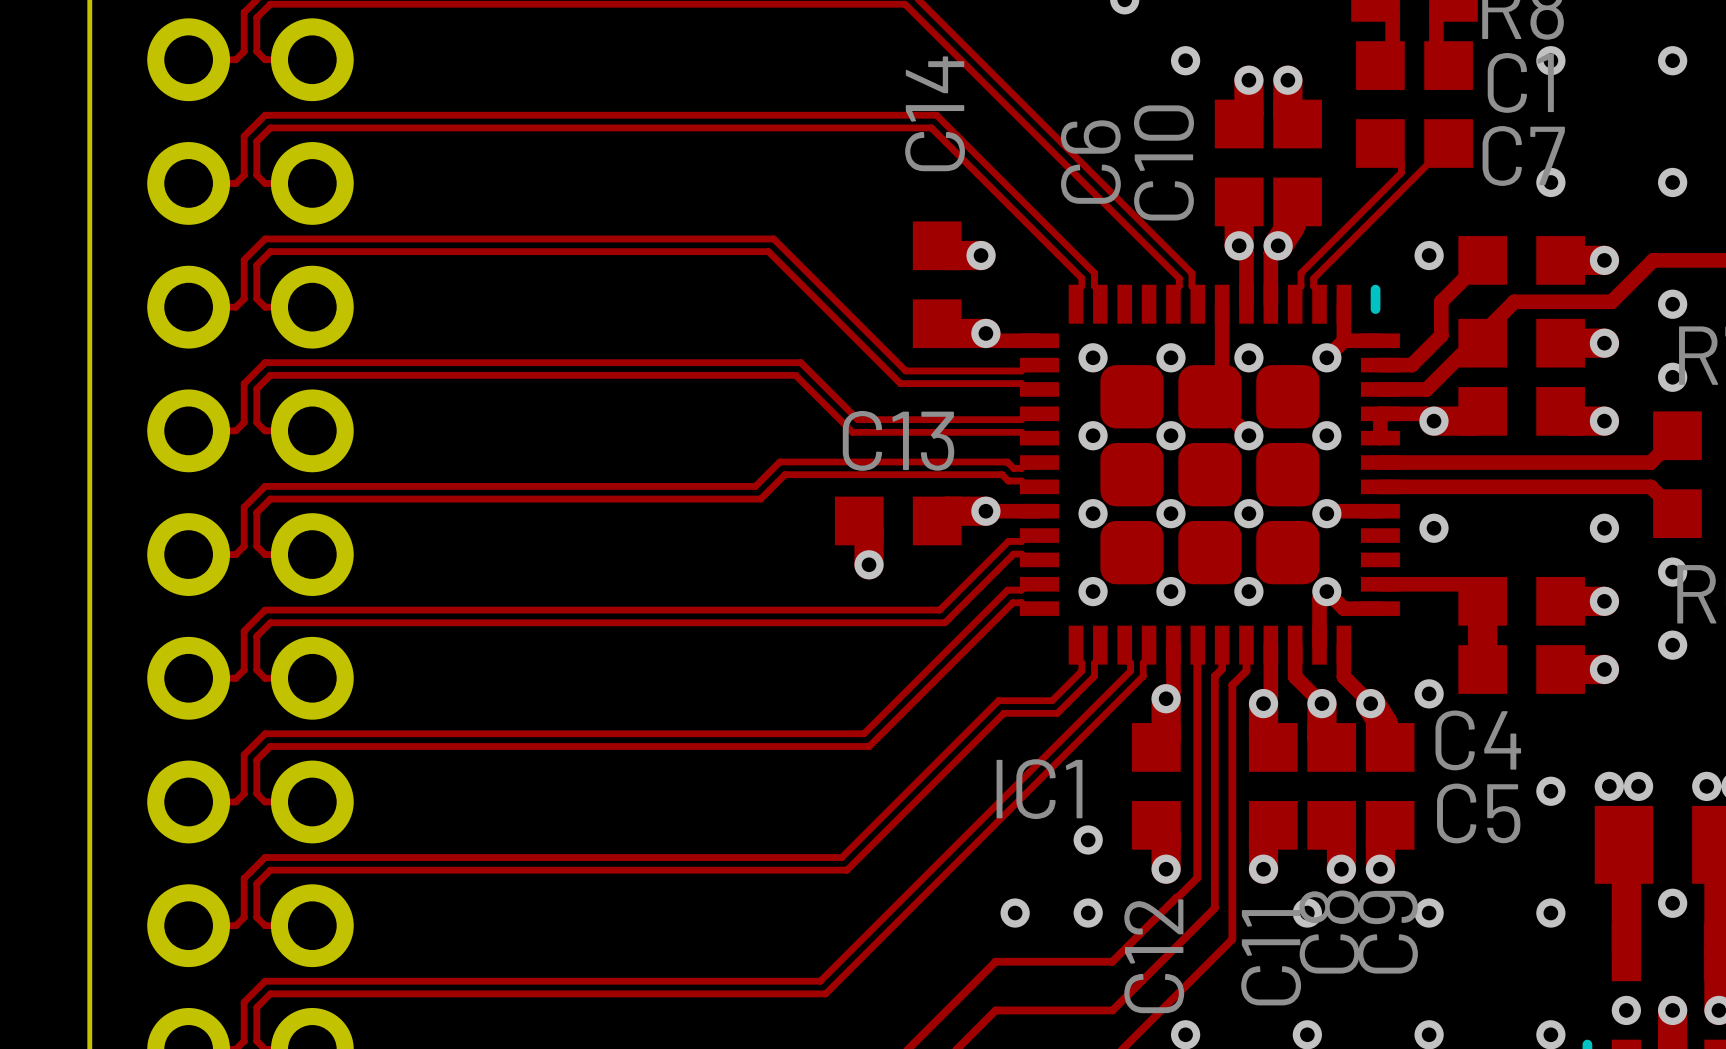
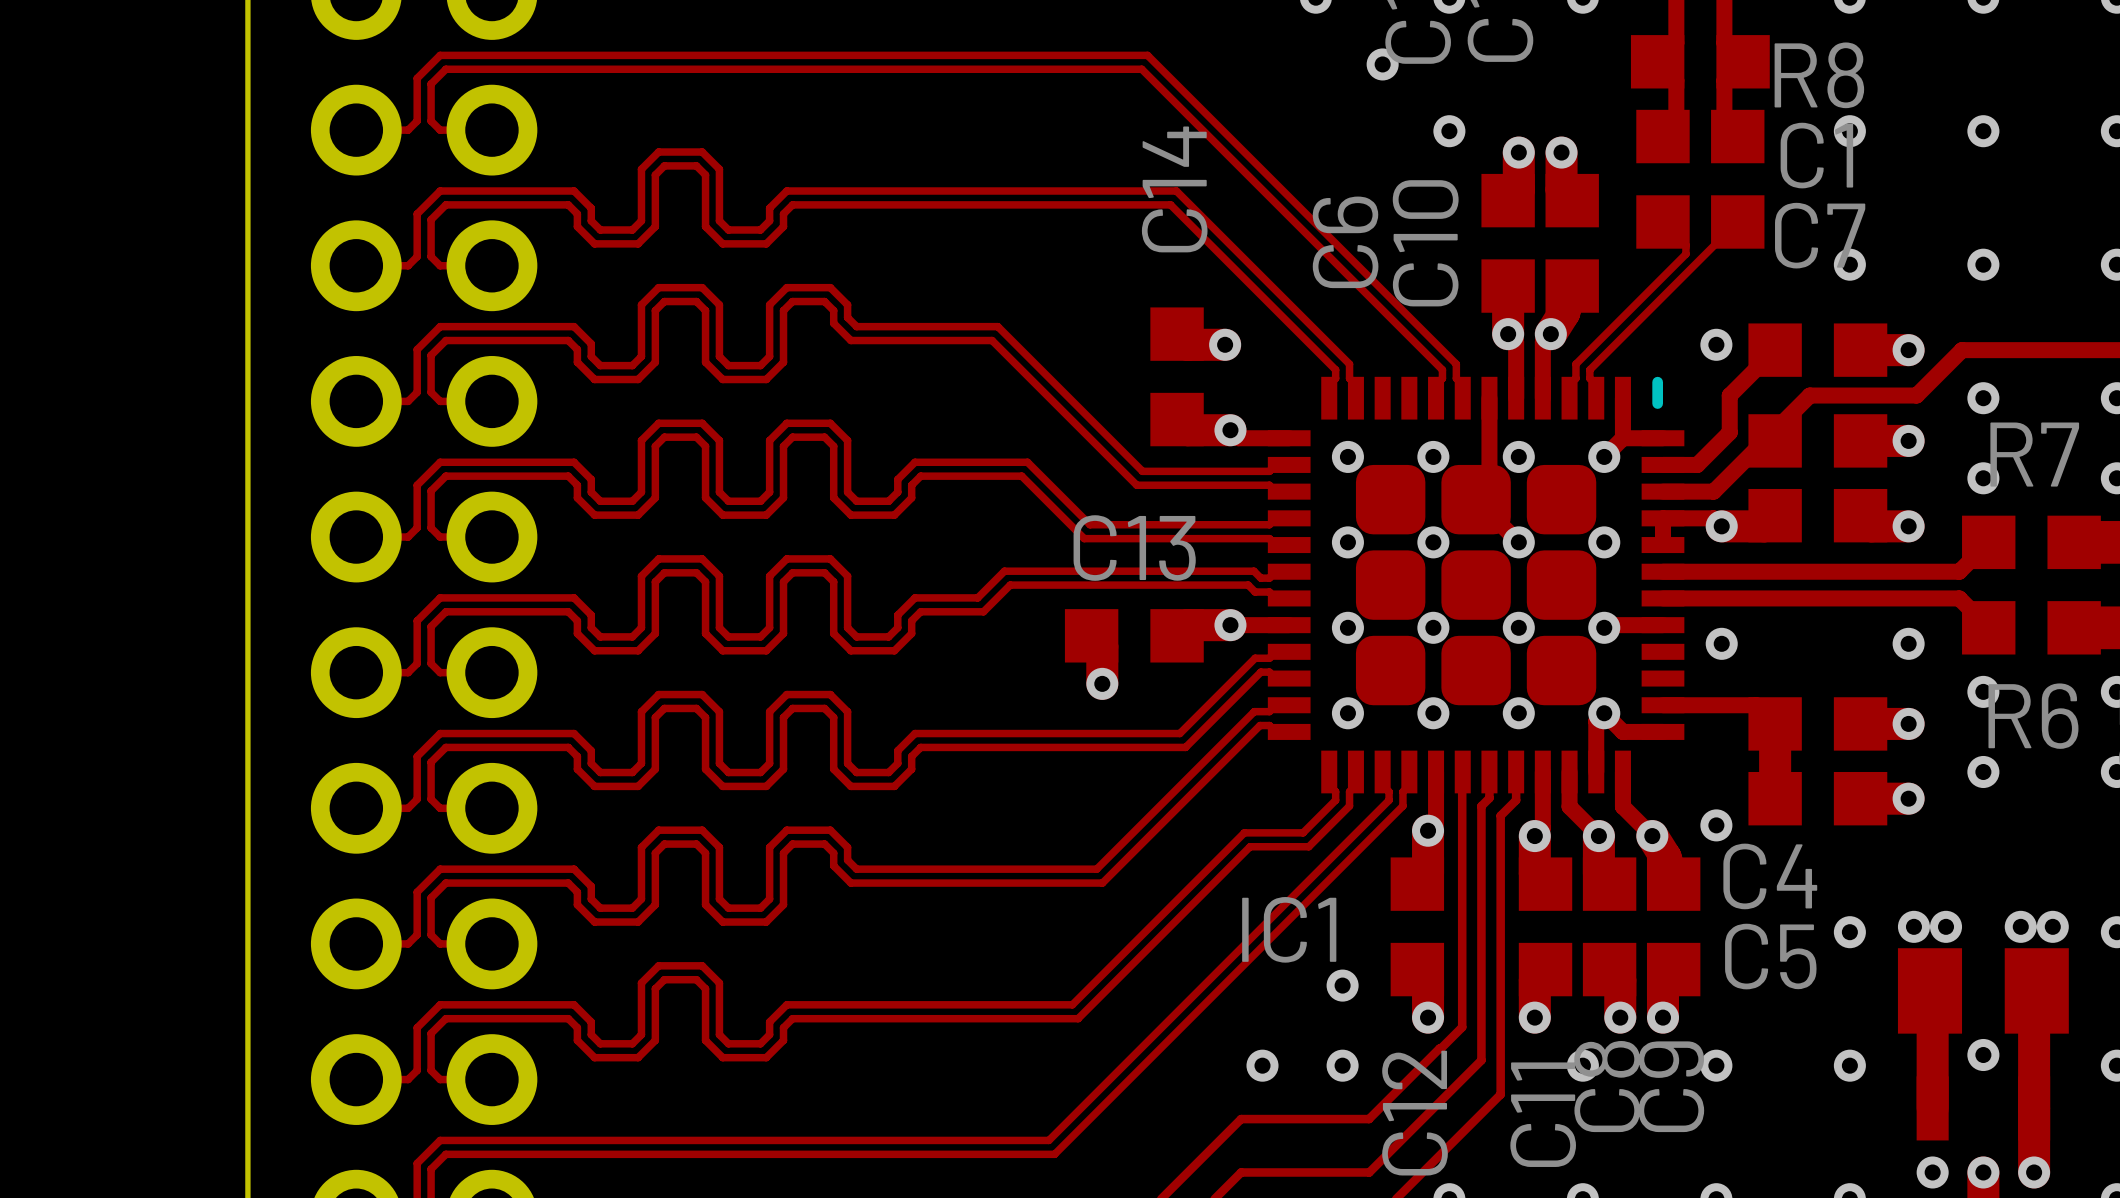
top track: (387, 115) (581, 115) -> (574, 191) (591, 208) (591, 220) (600, 229) (632, 229) (641, 220) (641, 169) (658, 152) (702, 152) (719, 169) (719, 220) (728, 229) (760, 229) (769, 220) (769, 208) (786, 191)
top track: (381, 127) (586, 127) -> (568, 204) (577, 213) (577, 226) (594, 243) (638, 243) (655, 226) (655, 174) (664, 165) (696, 165) (705, 174) (705, 226) (722, 243) (766, 243) (783, 226) (783, 213) (792, 204)
top track: (387, 238) (644, 238) -> (574, 326) (591, 343) (591, 356) (600, 365) (632, 365) (641, 356) (641, 304) (658, 287) (702, 287) (719, 304) (719, 356) (728, 365) (760, 365) (769, 356) (769, 304) (786, 287) (830, 287) (847, 304) (847, 317) (856, 326)
top track: (381, 251) (639, 251) -> (568, 340) (577, 349) (577, 362) (594, 379) (638, 379) (655, 362) (655, 310) (664, 301) (696, 301) (705, 310) (705, 362) (722, 379) (766, 379) (783, 362) (783, 310) (792, 301) (824, 301) (833, 310) (833, 323) (850, 340)
top track: (387, 362) (698, 362) -> (574, 462) (591, 479) (591, 492) (600, 501) (632, 501) (641, 492) (641, 440) (658, 423) (702, 423) (719, 440) (719, 492) (728, 501) (760, 501) (769, 492) (769, 440) (786, 423) (830, 423) (847, 440) (847, 492) (856, 501) (888, 501) (897, 492) (897, 479) (914, 462)
top track: (381, 375) (703, 375) -> (568, 476) (577, 485) (577, 497) (594, 515) (638, 515) (655, 497) (655, 446) (664, 437) (696, 437) (705, 446) (705, 497) (722, 515) (766, 515) (783, 497) (783, 446) (792, 437) (824, 437) (833, 446) (833, 497) (850, 515) (894, 515) (911, 497) (911, 485) (920, 476)
top track: (387, 486) (698, 486) -> (574, 597) (591, 615) (591, 627) (600, 636) (632, 636) (641, 627) (641, 576) (658, 558) (702, 558) (719, 576) (719, 627) (728, 636) (760, 636) (769, 627) (769, 576) (786, 558) (830, 558) (847, 576) (847, 627) (856, 636) (888, 636) (897, 627) (897, 615) (914, 597)
top track: (381, 499) (703, 499) -> (568, 611) (577, 620) (577, 633) (594, 650) (638, 650) (655, 633) (655, 581) (664, 572) (696, 572) (705, 581) (705, 633) (722, 650) (766, 650) (783, 633) (783, 581) (792, 572) (824, 572) (833, 581) (833, 633) (850, 650) (894, 650) (911, 633) (911, 620) (920, 611)
top track: (387, 610) (698, 610) -> (574, 733) (591, 750) (591, 763) (600, 772) (632, 772) (641, 763) (641, 711) (658, 694) (702, 694) (719, 711) (719, 763) (728, 772) (760, 772) (769, 763) (769, 711) (786, 694) (830, 694) (847, 711) (847, 763) (856, 772) (888, 772) (897, 763) (897, 750) (914, 733)
top track: (381, 622) (703, 622) -> (568, 747) (577, 756) (577, 769) (594, 786) (638, 786) (655, 769) (655, 717) (664, 708) (696, 708) (705, 717) (705, 769) (722, 786) (766, 786) (783, 769) (783, 717) (792, 708) (824, 708) (833, 717) (833, 769) (850, 786) (894, 786) (911, 769) (911, 756) (920, 747)
top track: (387, 733) (644, 733) -> (574, 869) (591, 886) (591, 899) (600, 908) (632, 908) (641, 899) (641, 847) (658, 830) (702, 830) (719, 847) (719, 899) (728, 908) (760, 908) (769, 899) (769, 847) (786, 830) (830, 830) (847, 847) (847, 860) (856, 869)
top track: (381, 746) (639, 746) -> (568, 883) (577, 892) (577, 904) (594, 922) (638, 922) (655, 904) (655, 853) (664, 844) (696, 844) (705, 853) (705, 904) (722, 922) (766, 922) (783, 904) (783, 853) (792, 844) (824, 844) (833, 853) (833, 865) (850, 883)
top track: (387, 857) (581, 857) -> (574, 1004) (591, 1022) (591, 1034) (600, 1043) (632, 1043) (641, 1034) (641, 983) (658, 965) (702, 965) (719, 983) (719, 1034) (728, 1043) (760, 1043) (769, 1034) (769, 1022) (786, 1004)
top track: (381, 870) (586, 870) -> (568, 1018) (577, 1027) (577, 1040) (594, 1057) (638, 1057) (655, 1040) (655, 988) (664, 979) (696, 979) (705, 988) (705, 1040) (722, 1057) (766, 1057) (783, 1040) (783, 1027) (792, 1018)

